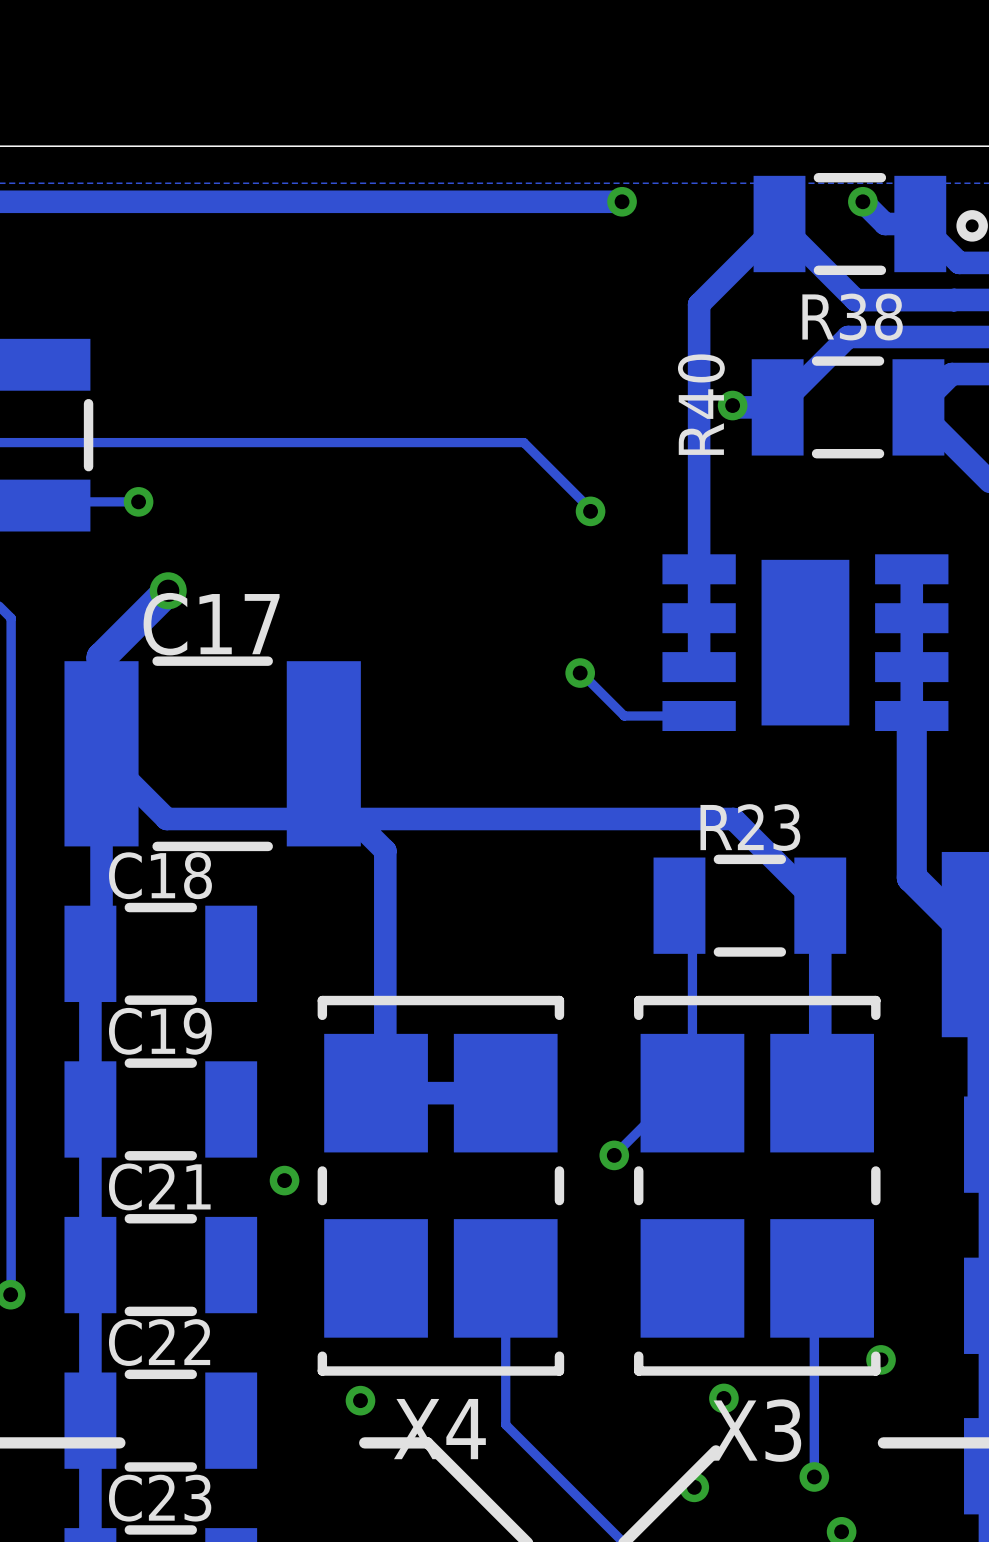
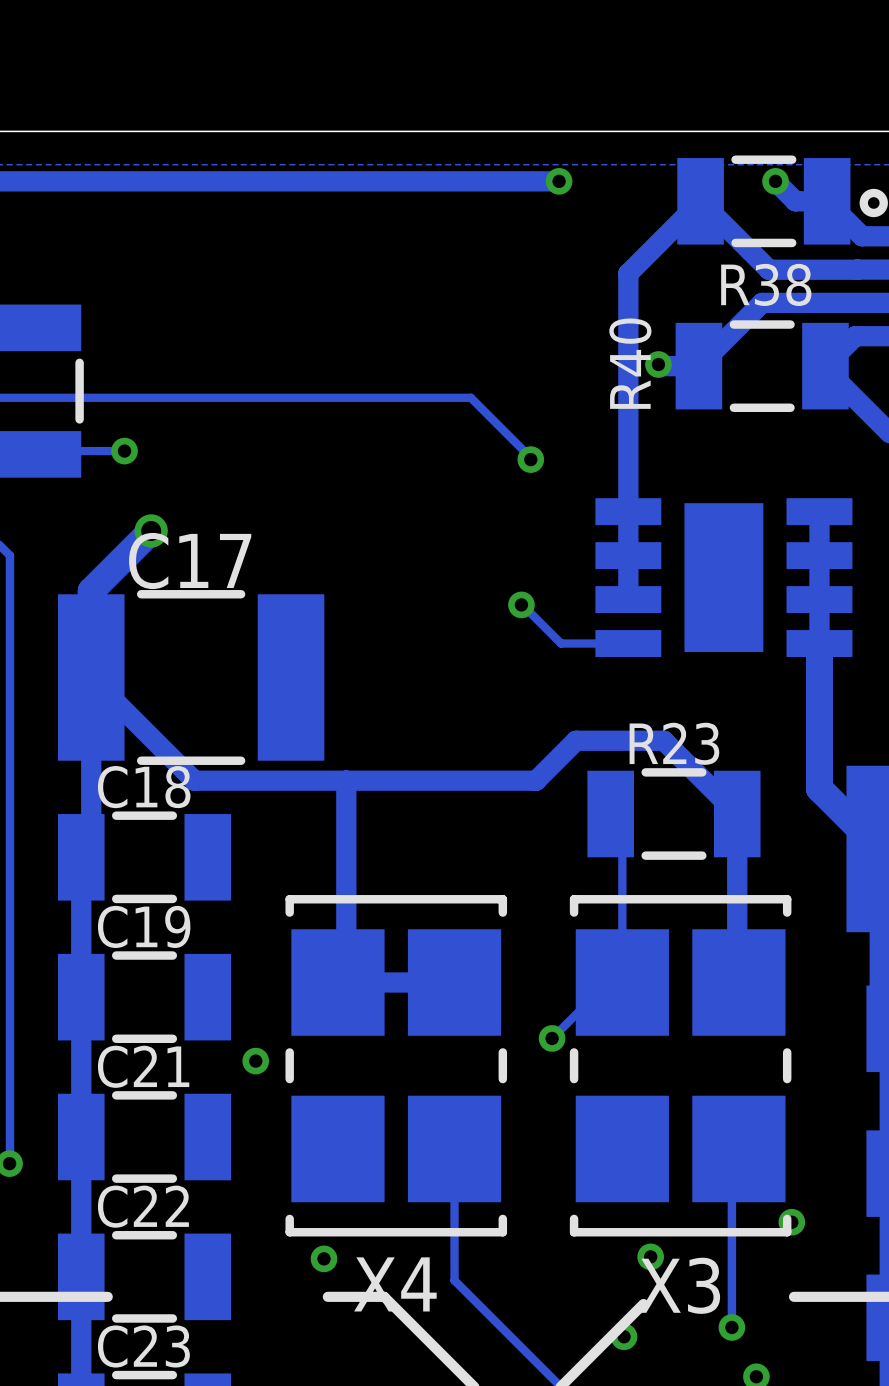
track: (166, 818) (733, 818) (738, 824) -> (149, 736) (194, 780) (536, 780) (576, 740) (663, 740)
track: (353, 818) (385, 850) (385, 868) -> none

